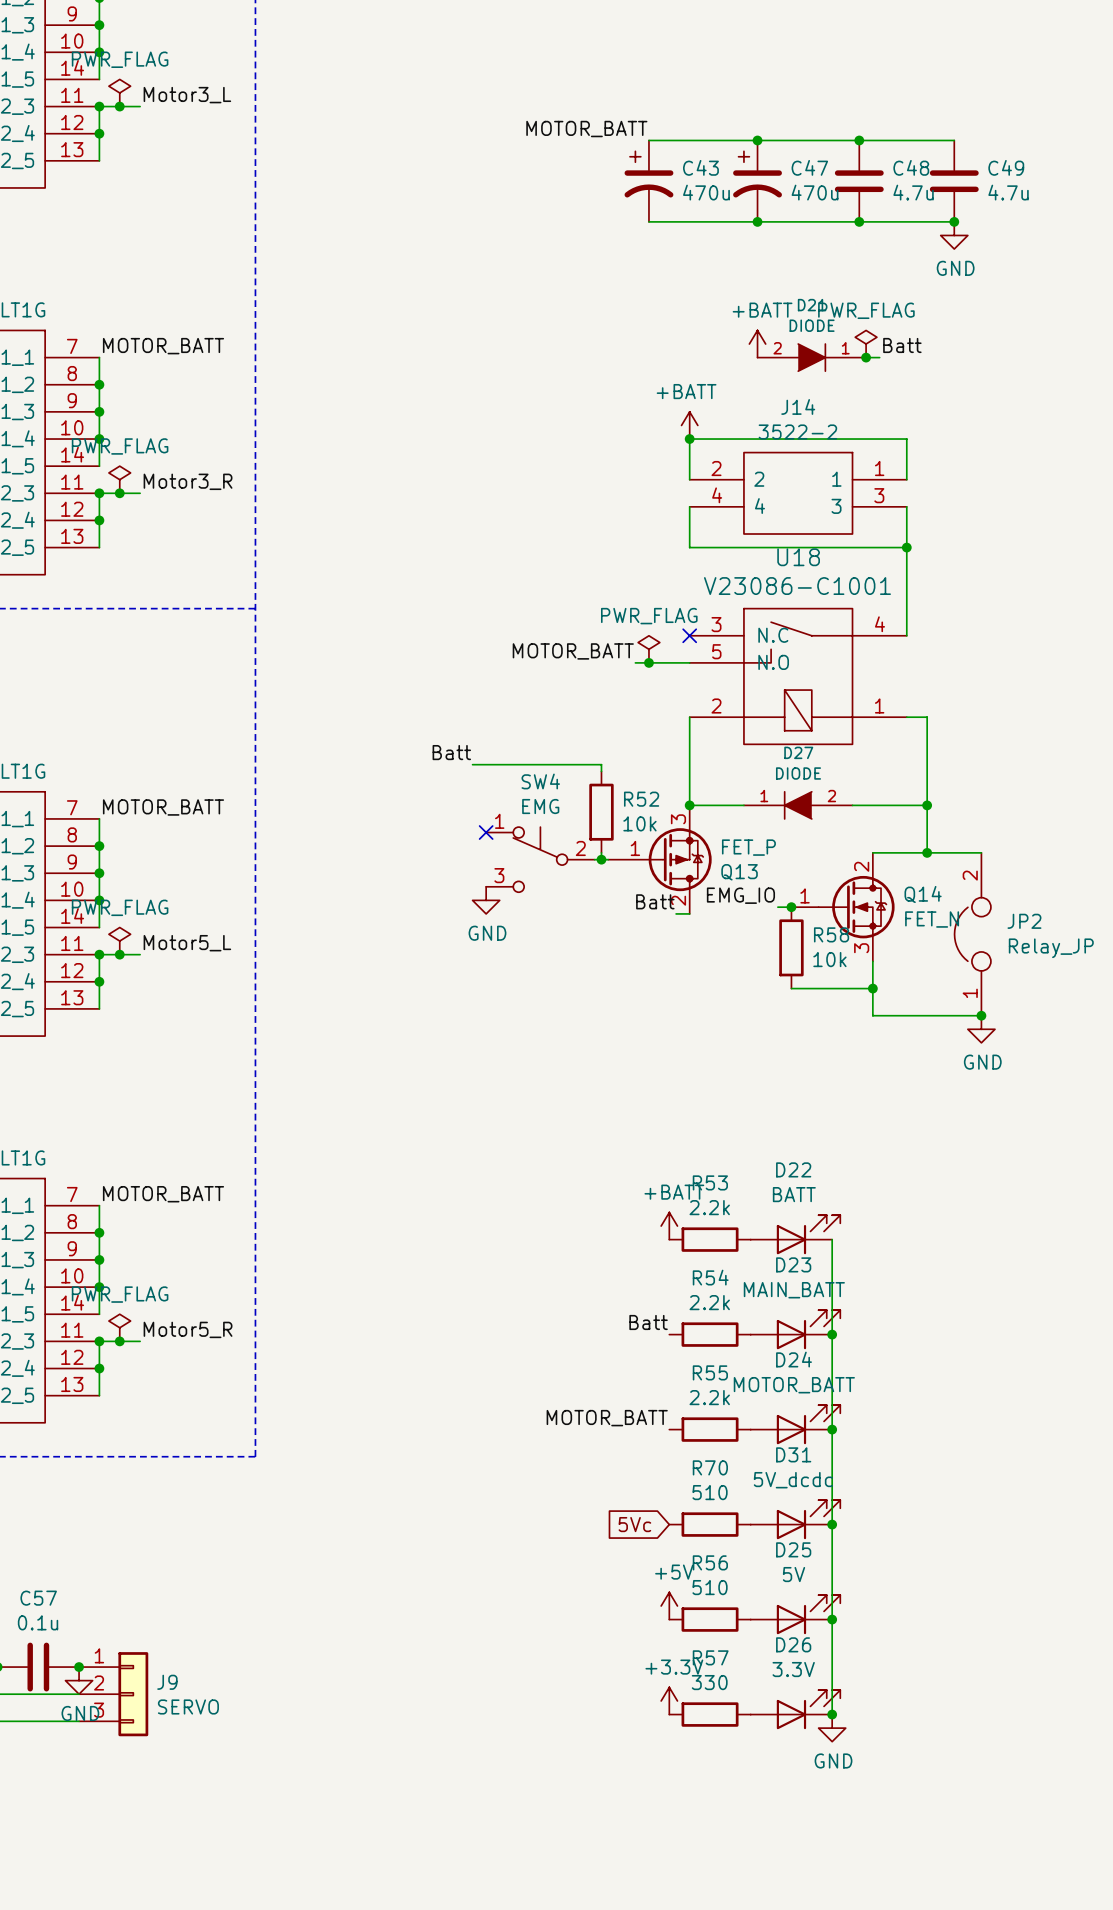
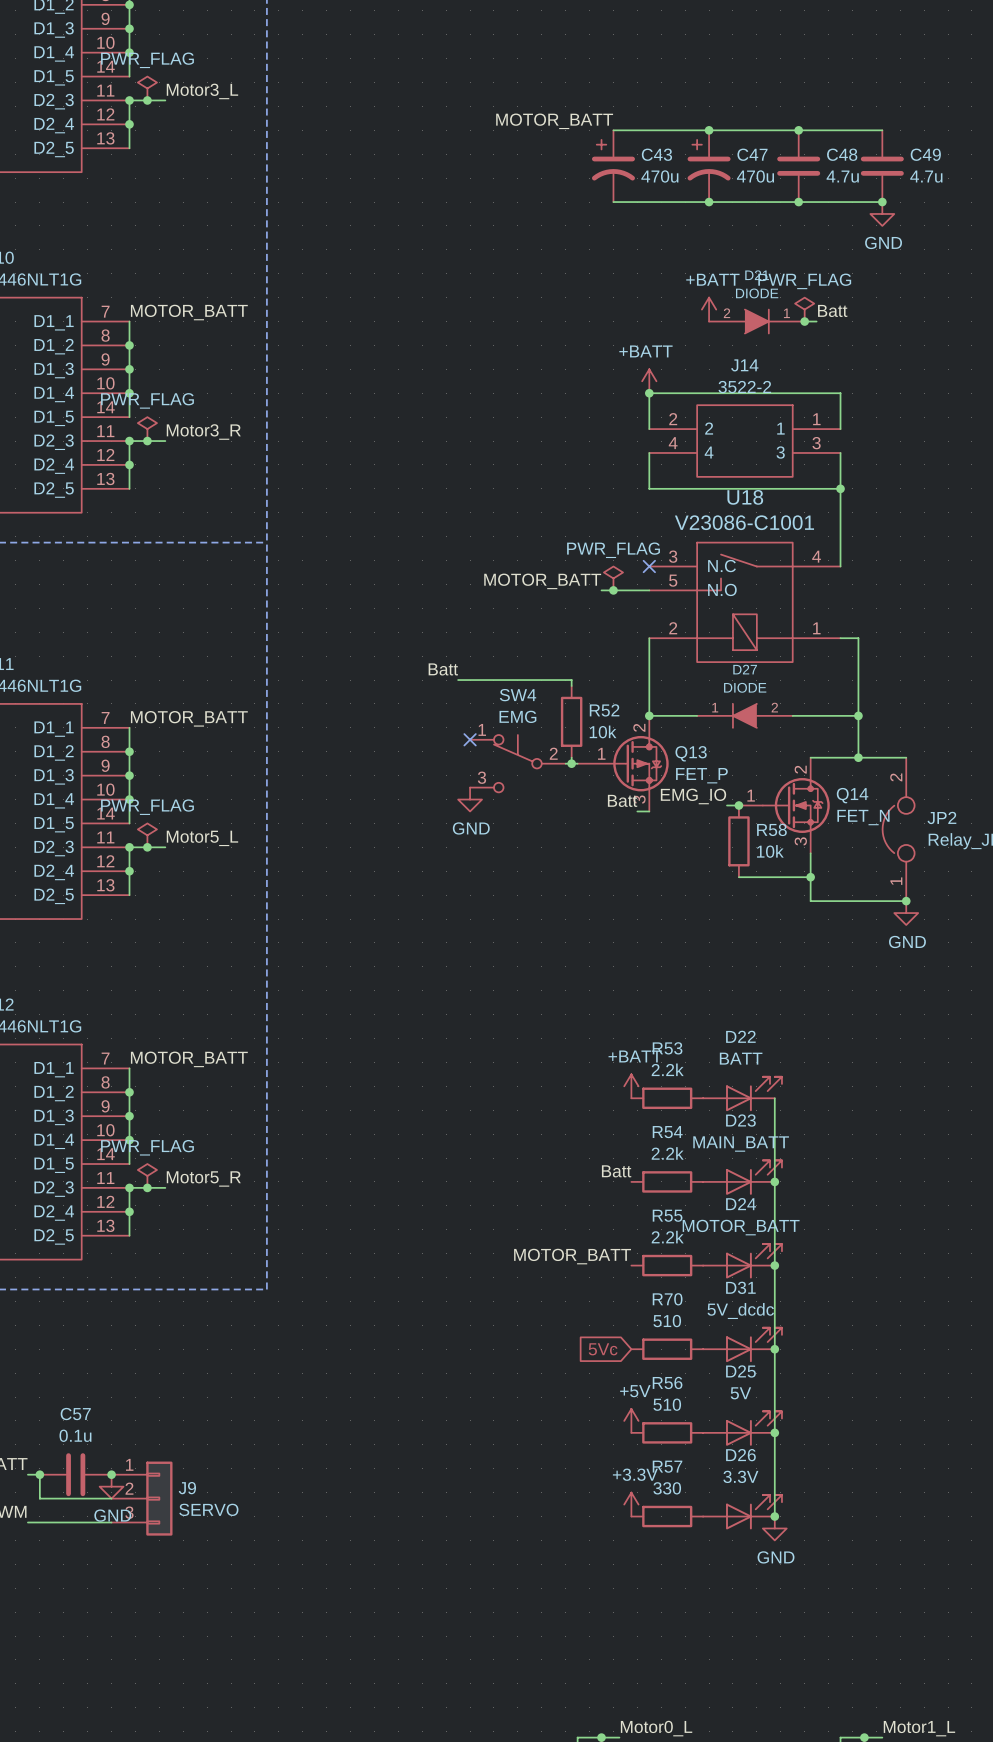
Q13 flip: as is (680, 859) -> up-down (640, 763)

